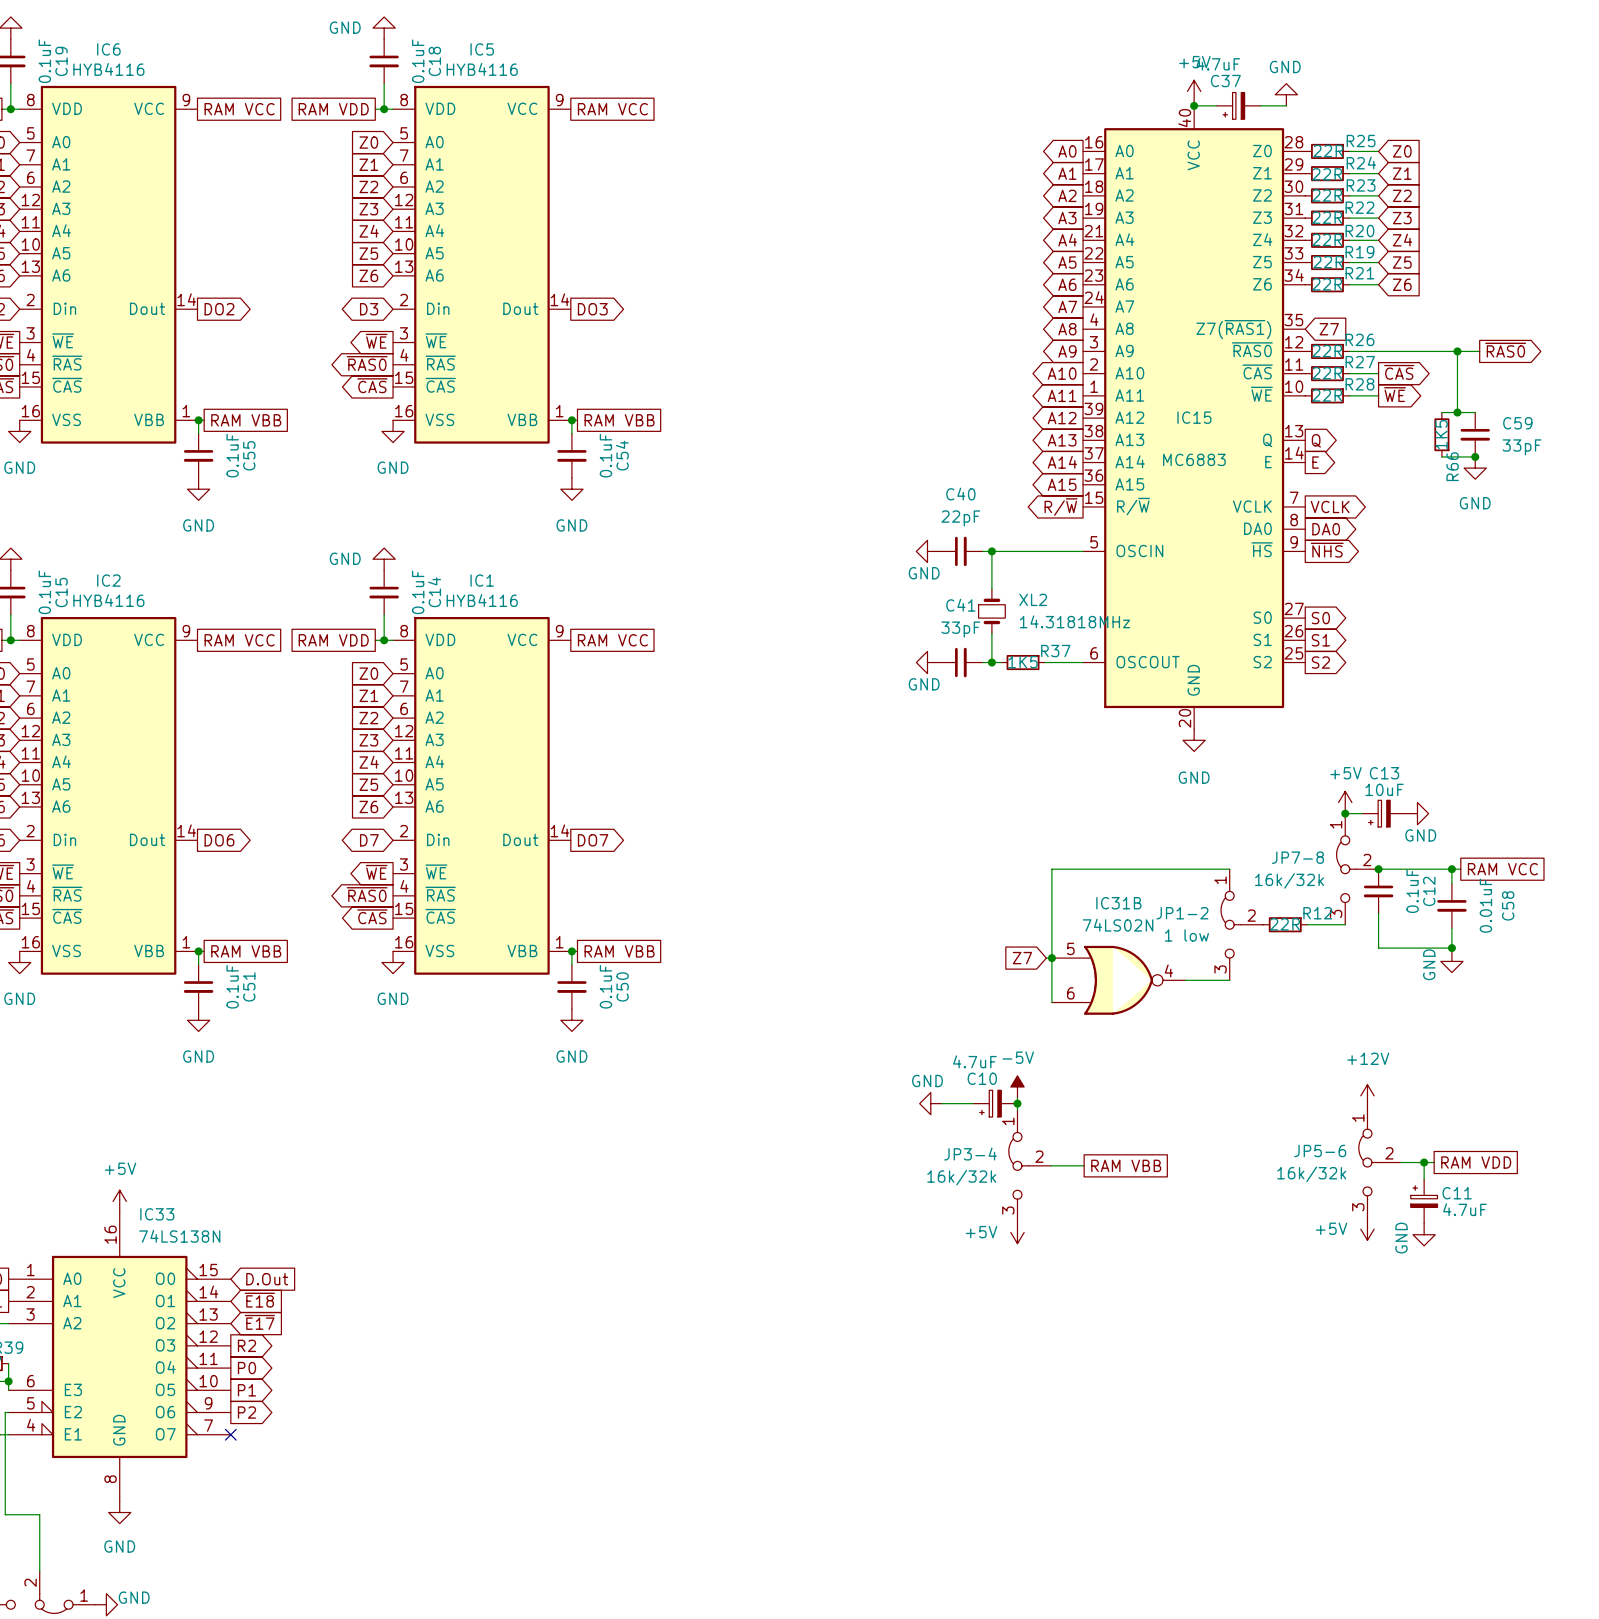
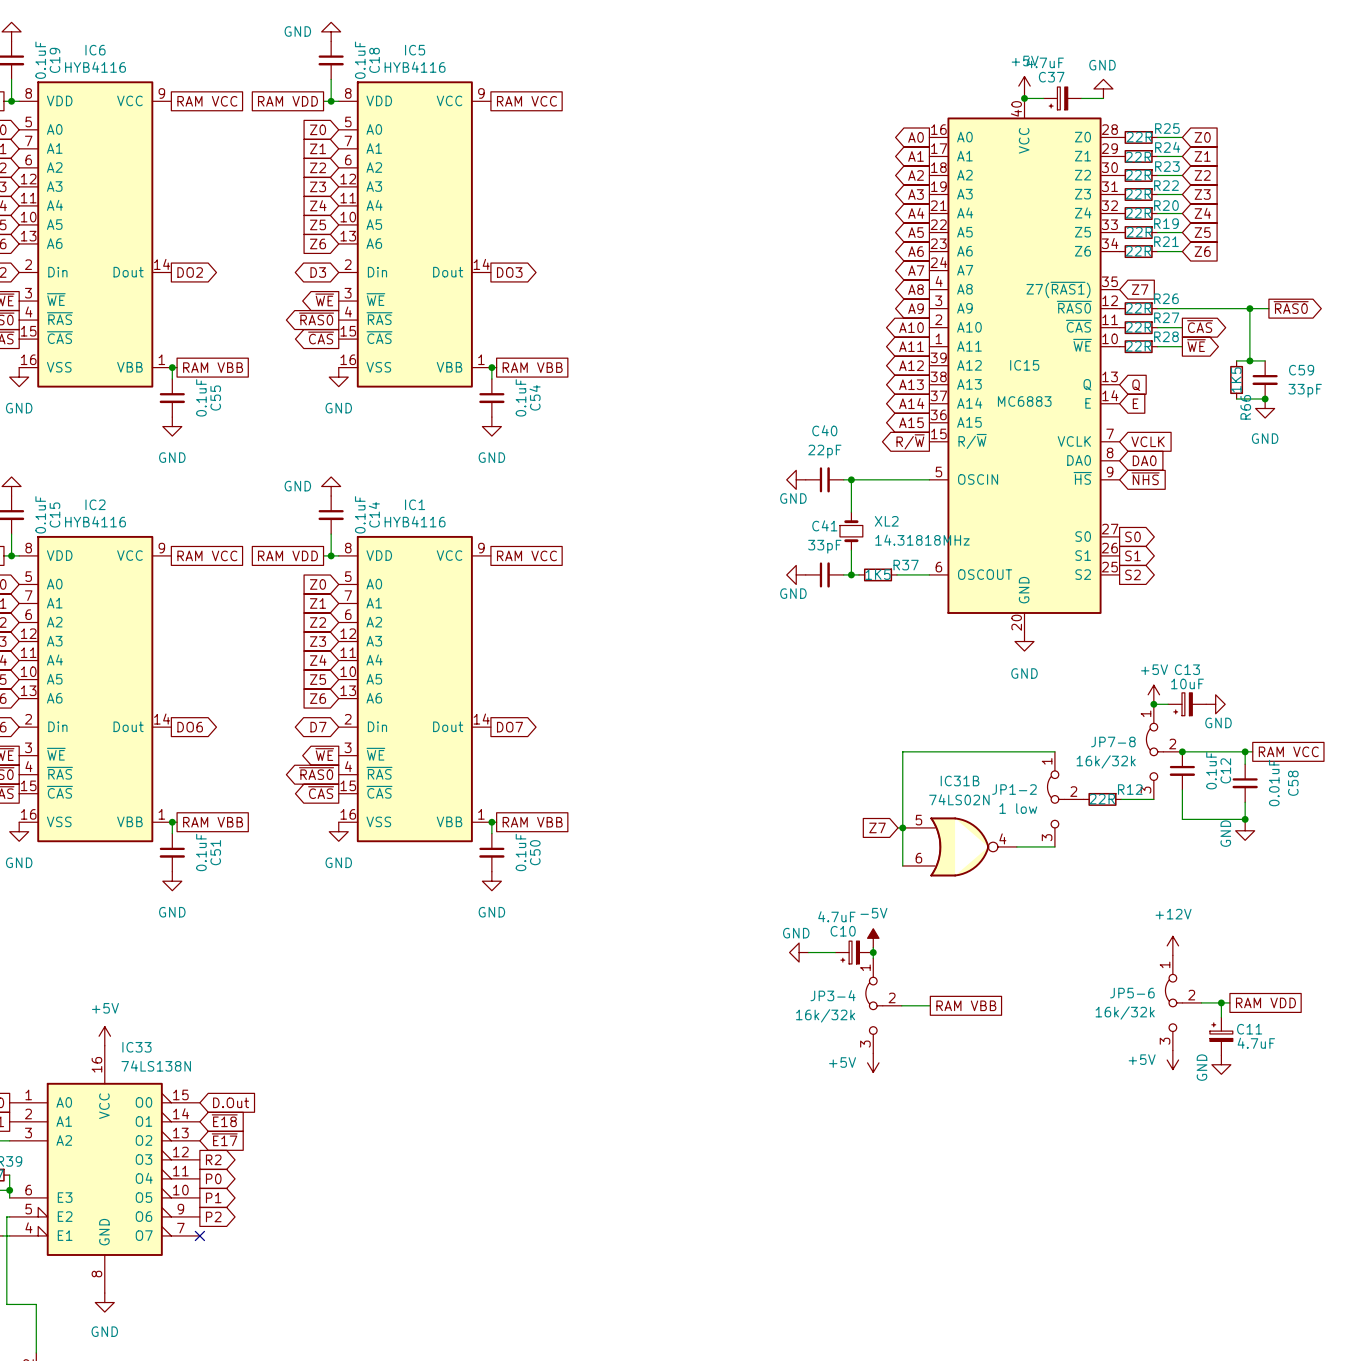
global label shape: output (1316, 440) -> input (1136, 385)
global label shape: output (1315, 462) -> input (1135, 403)
global label shape: output (1330, 506) -> input (1148, 441)
global label shape: output (1326, 529) -> input (1144, 460)
global label shape: output (1327, 550) -> input (1145, 478)

